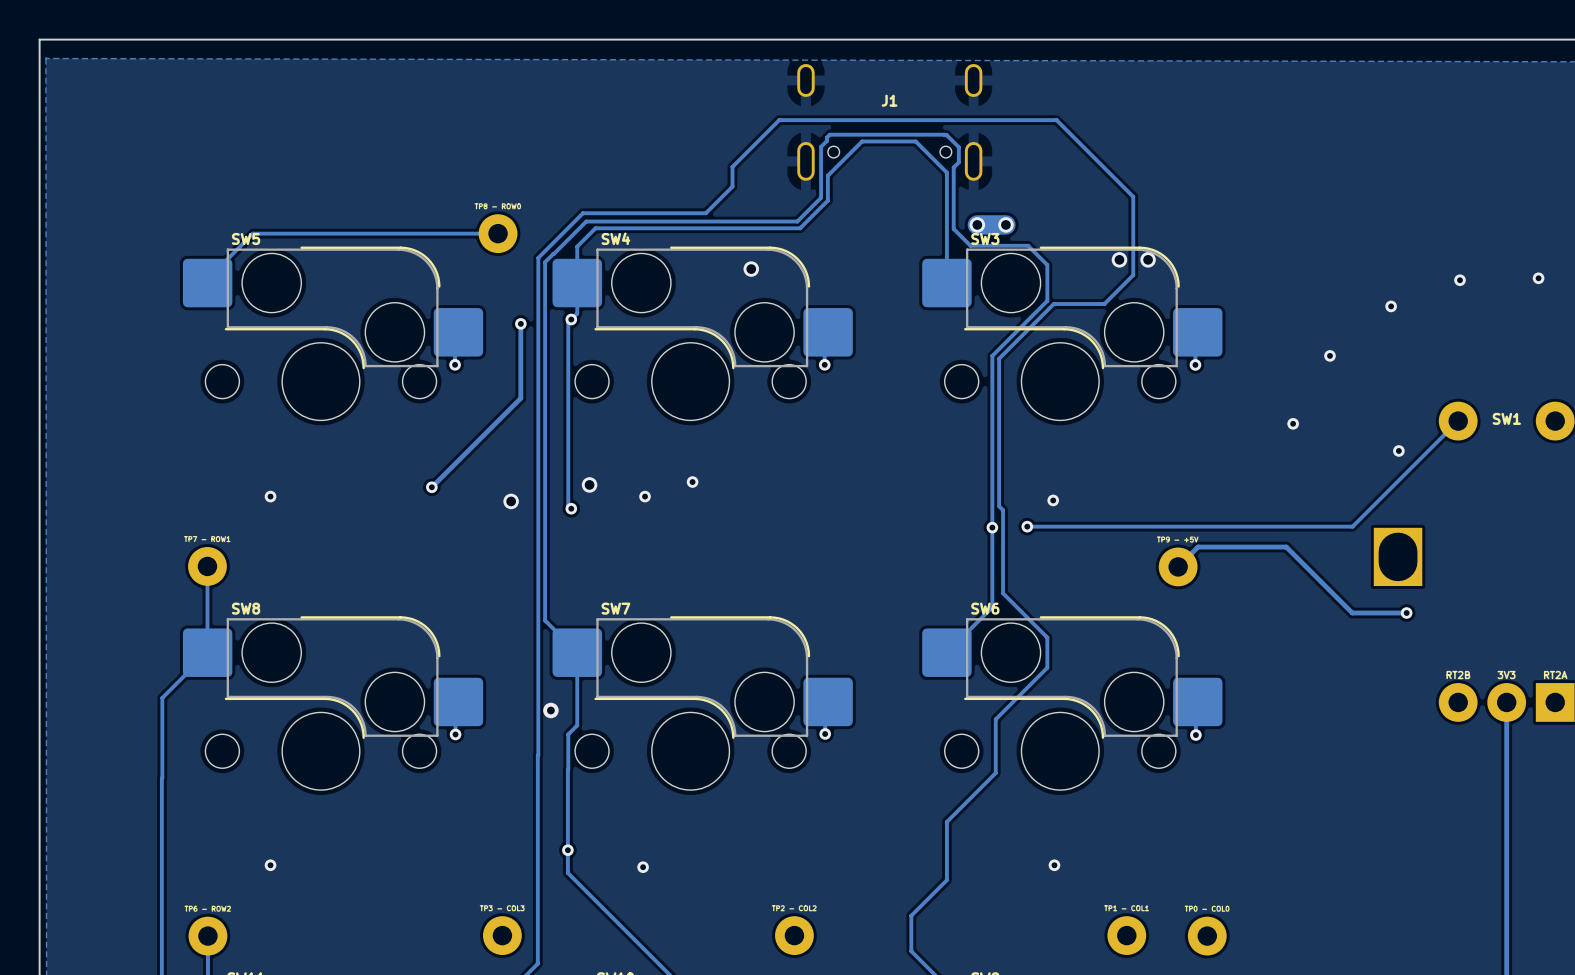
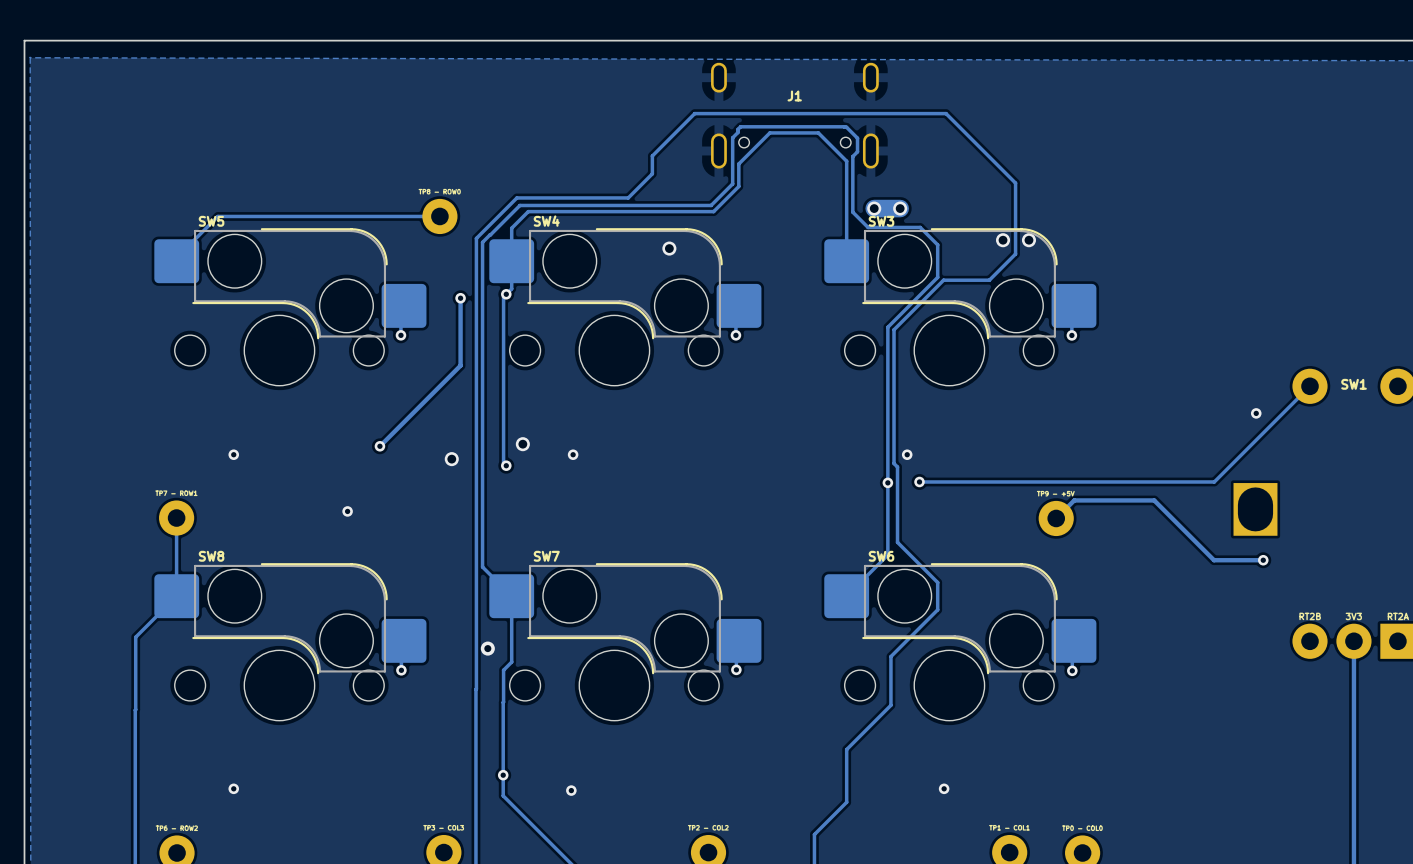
via: (1538, 278) -> none
via: (1460, 280) -> none
via: (1391, 306) -> none
via: (1329, 355) -> none
via: (1293, 423) -> none
via: (692, 482) -> none
via position: (1053, 500) -> (907, 454)
via: none -> (347, 511)

